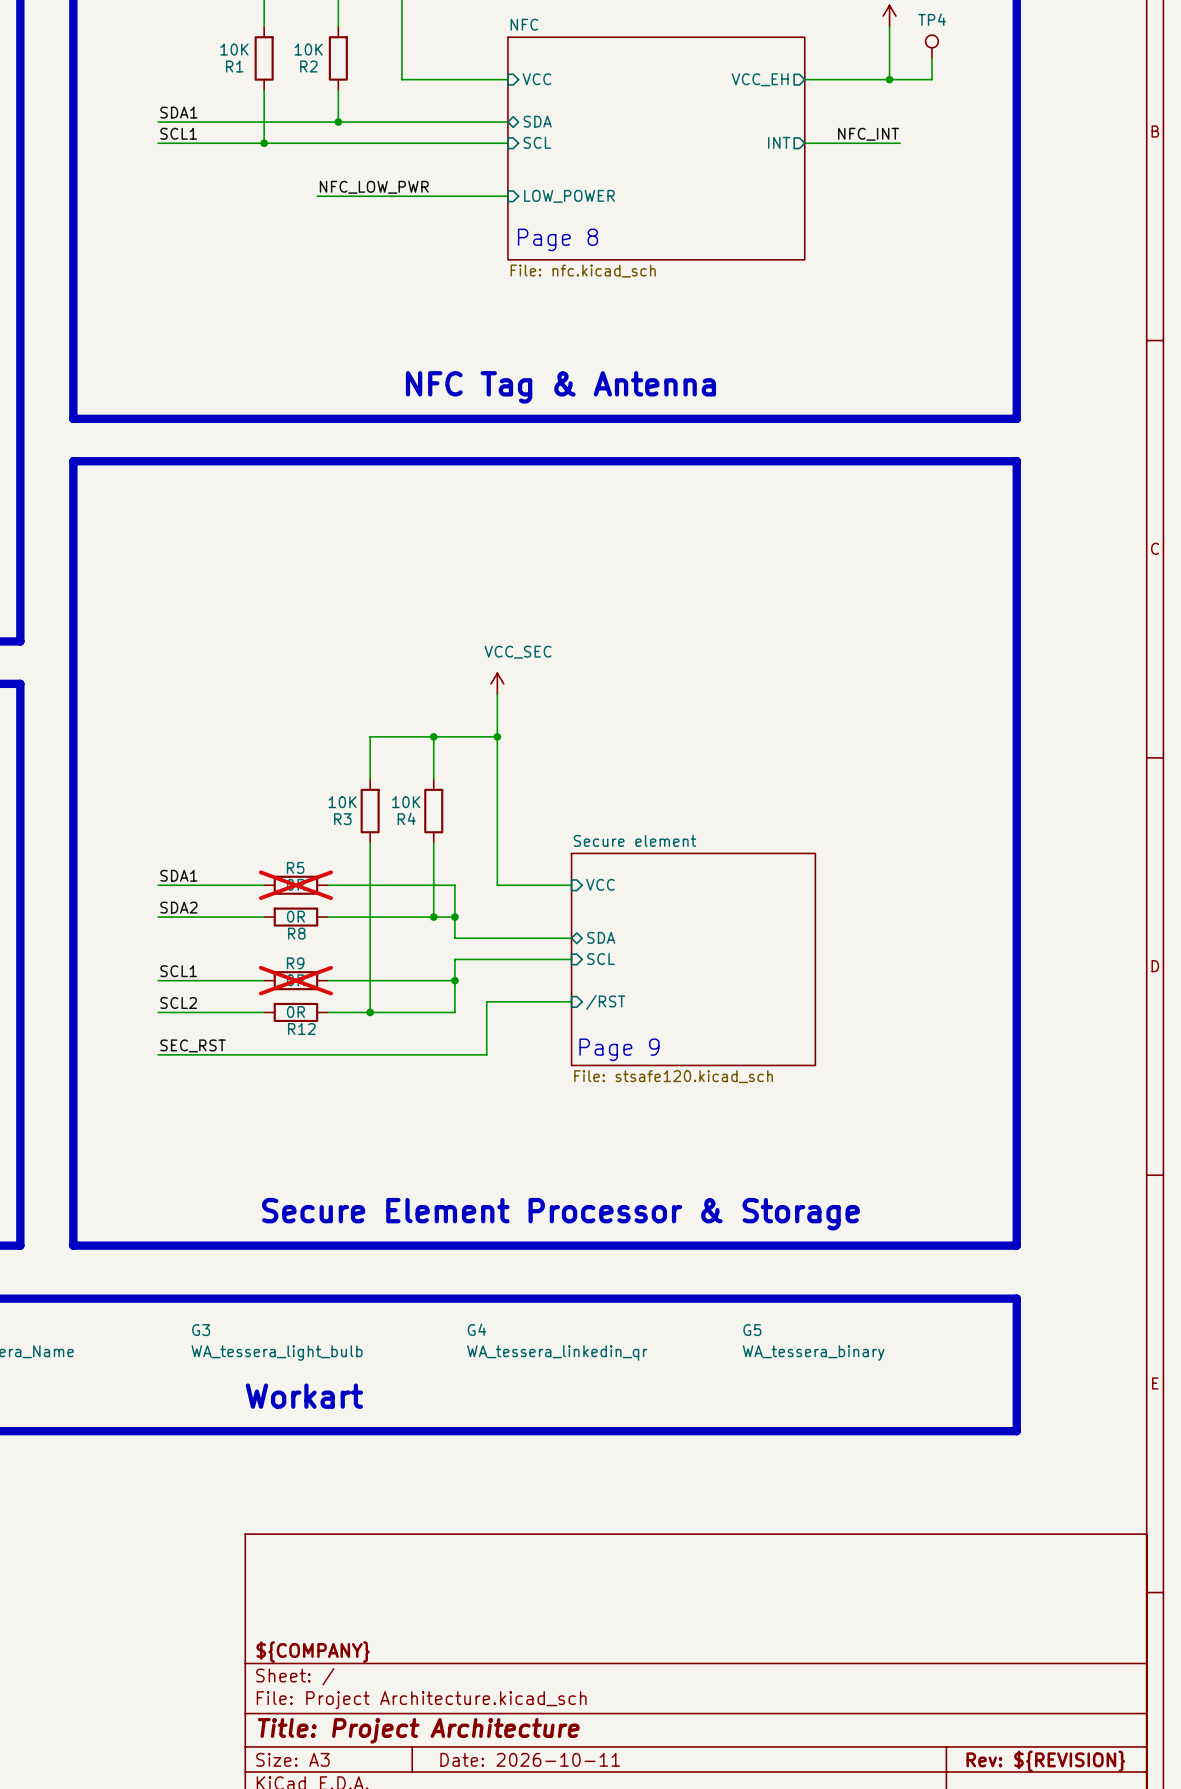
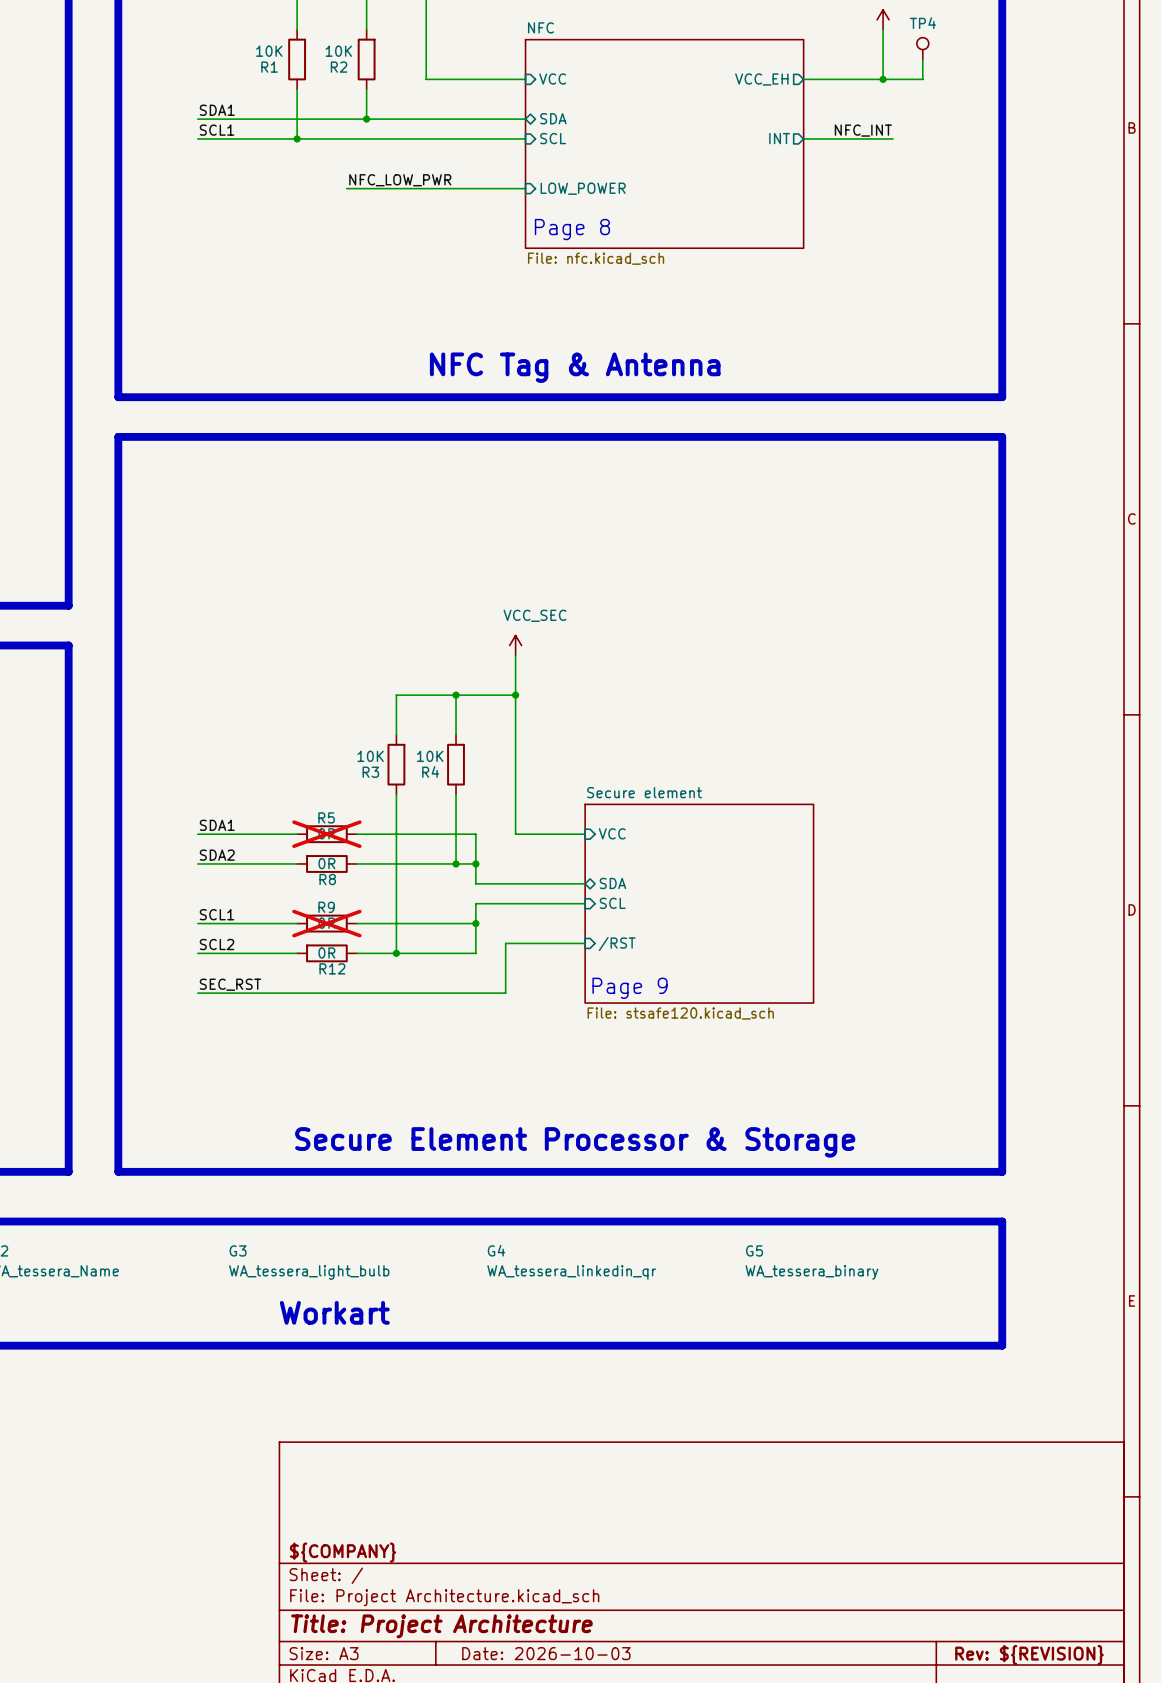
title block: Date: 2026-10-11 (530, 1759) -> Date: 2026-10-03 (546, 1653)

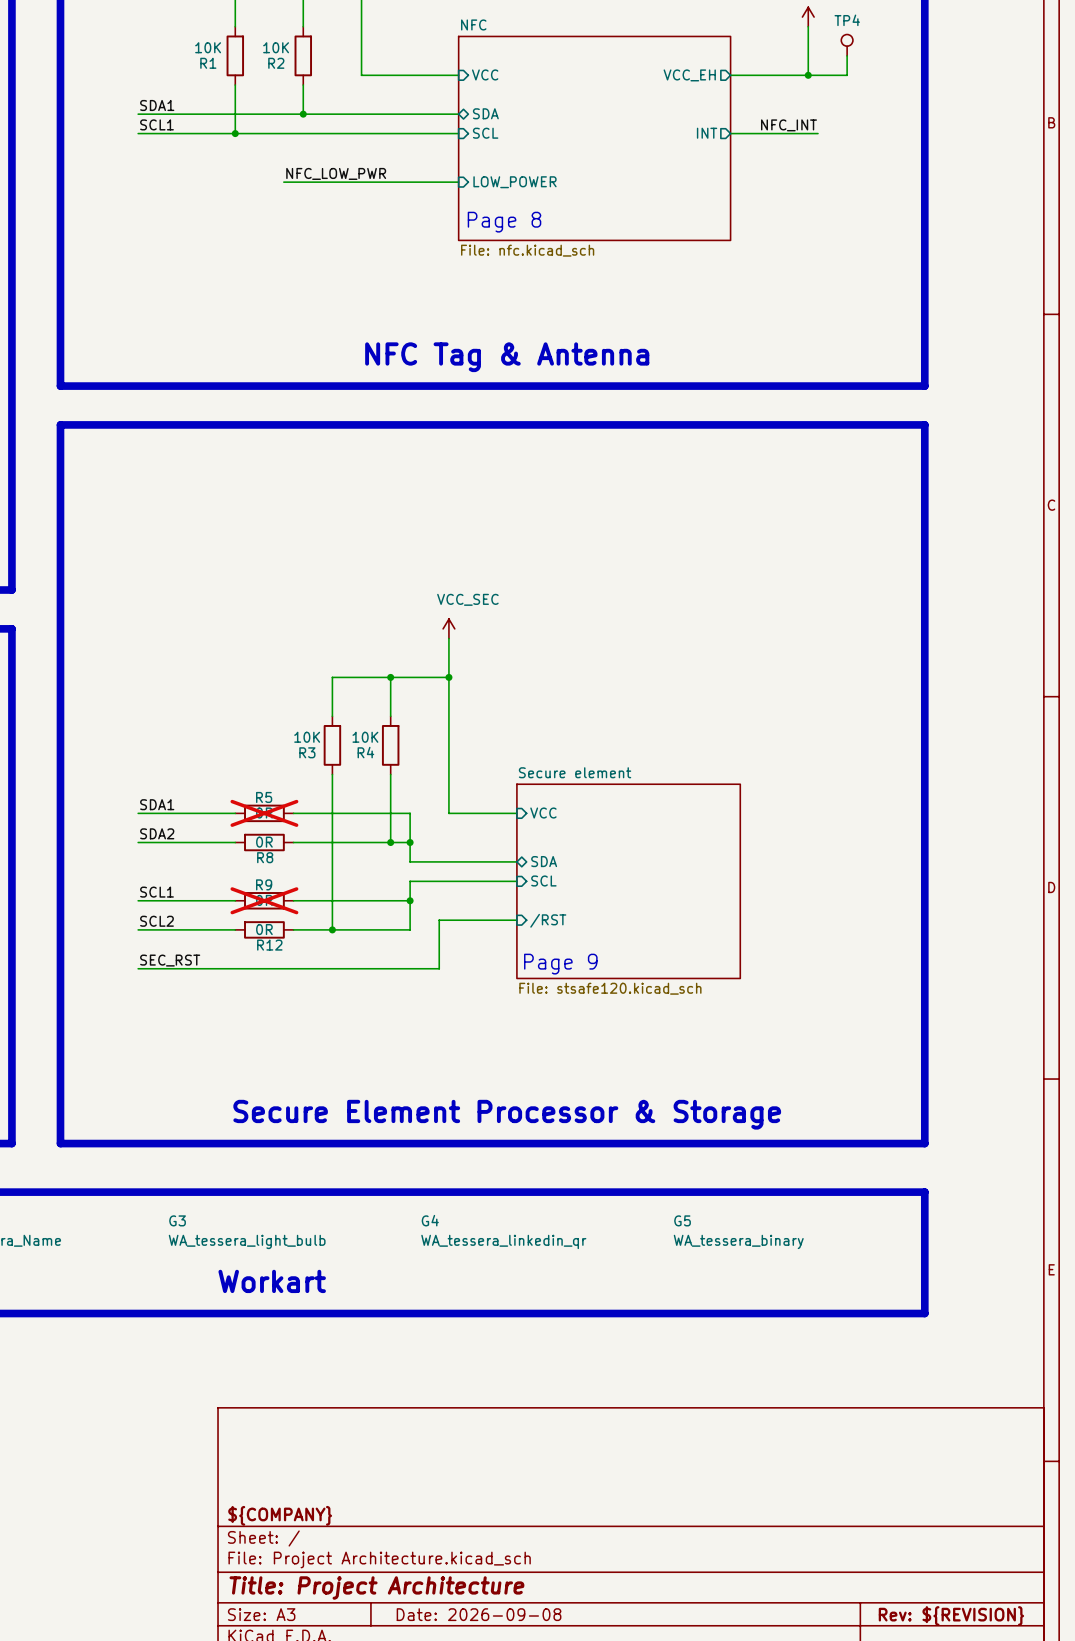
title block: Date: 2026-10-03 (546, 1653) -> Date: 2026-09-08 (479, 1614)

